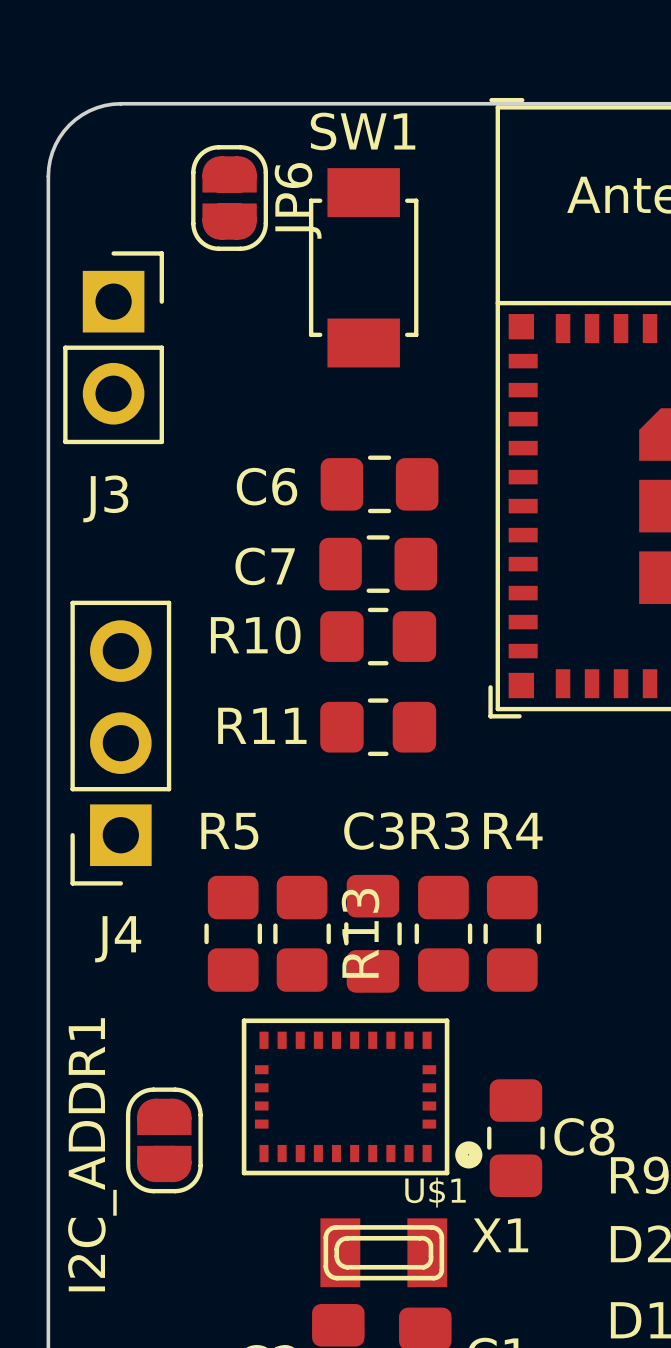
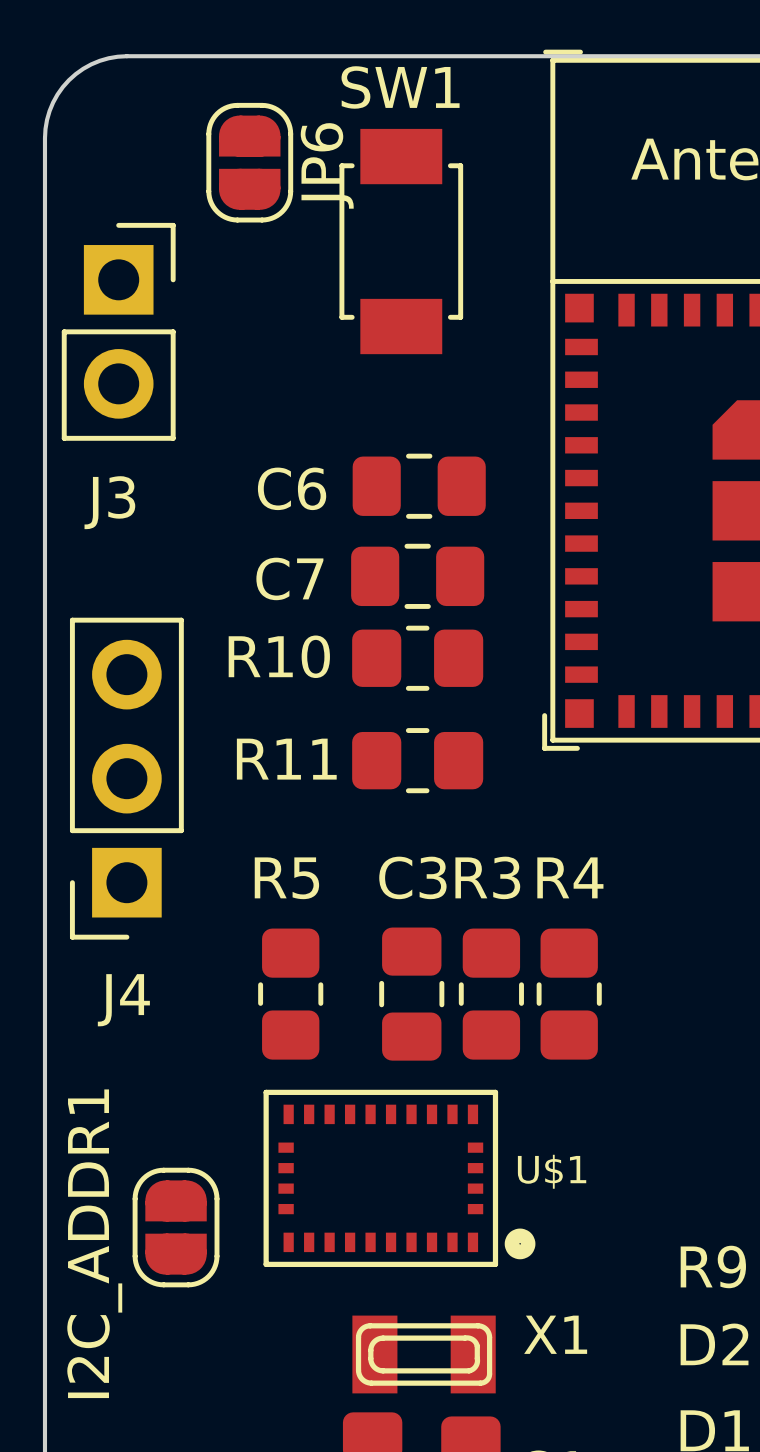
R5 position: (233, 933) -> (290, 994)
R13: (302, 933) -> none
C8: (515, 1138) -> none
U$1 name position: U$1 (435, 1192) -> U$1 (552, 1171)

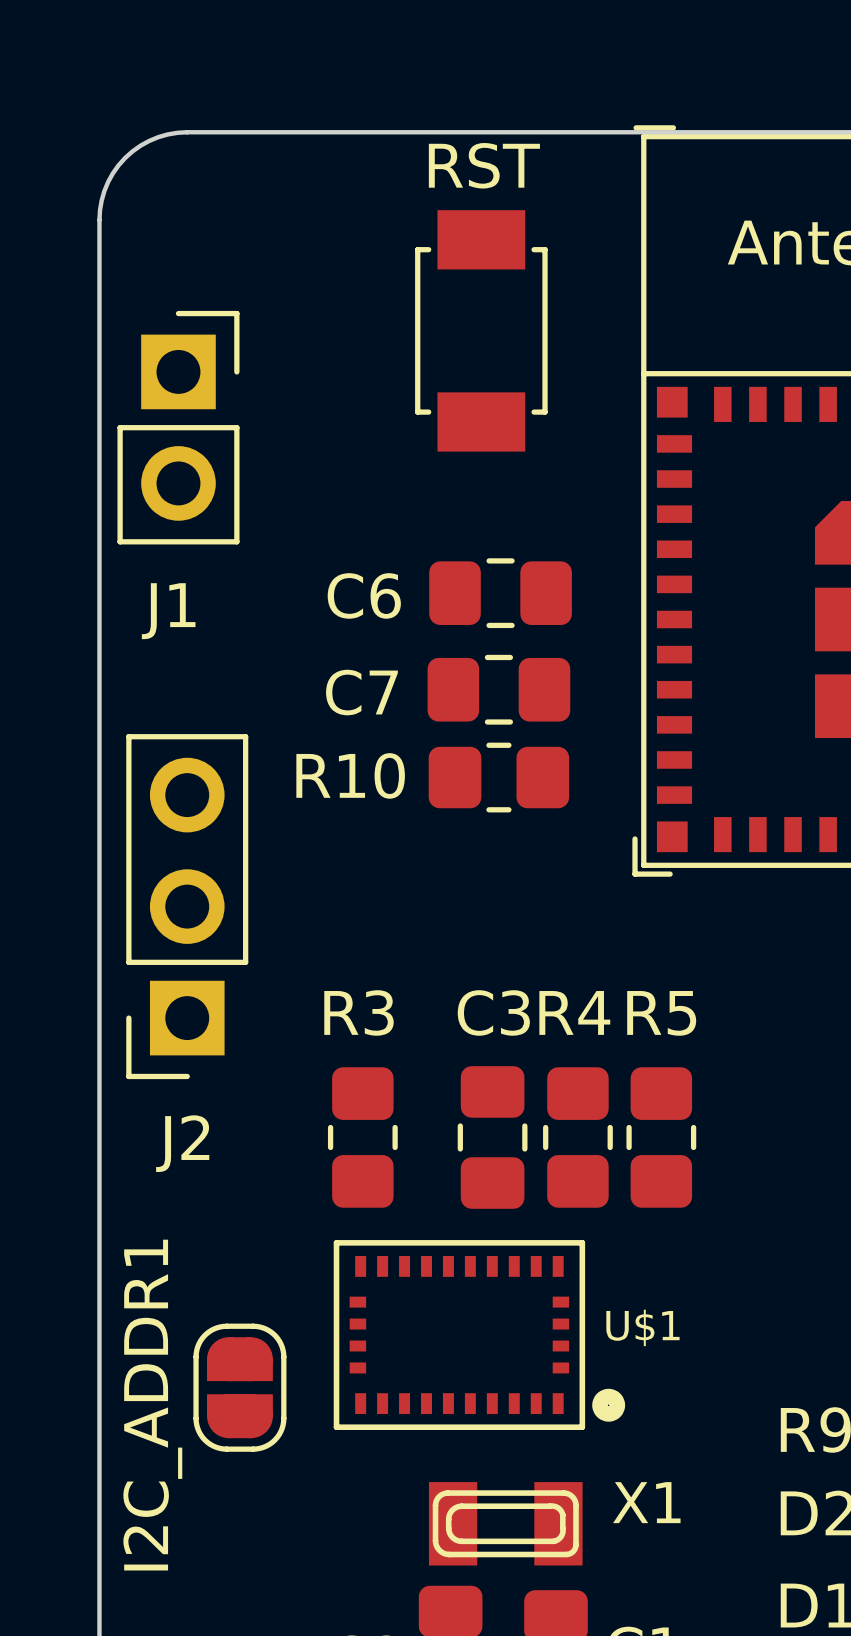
SW1 name: SW1 (400, 87) -> RST (484, 165)
JP6: (249, 162) -> none
J3 name: J3 (109, 502) -> J1 (168, 611)
R11: (417, 760) -> none
R3 name: R3 (487, 877) -> R4 (574, 1012)
R4 name: R4 (570, 877) -> R5 (661, 1013)
R5 name: R5 (286, 878) -> R3 (359, 1012)
J4 name: J4 (123, 1000) -> J2 (182, 1143)

